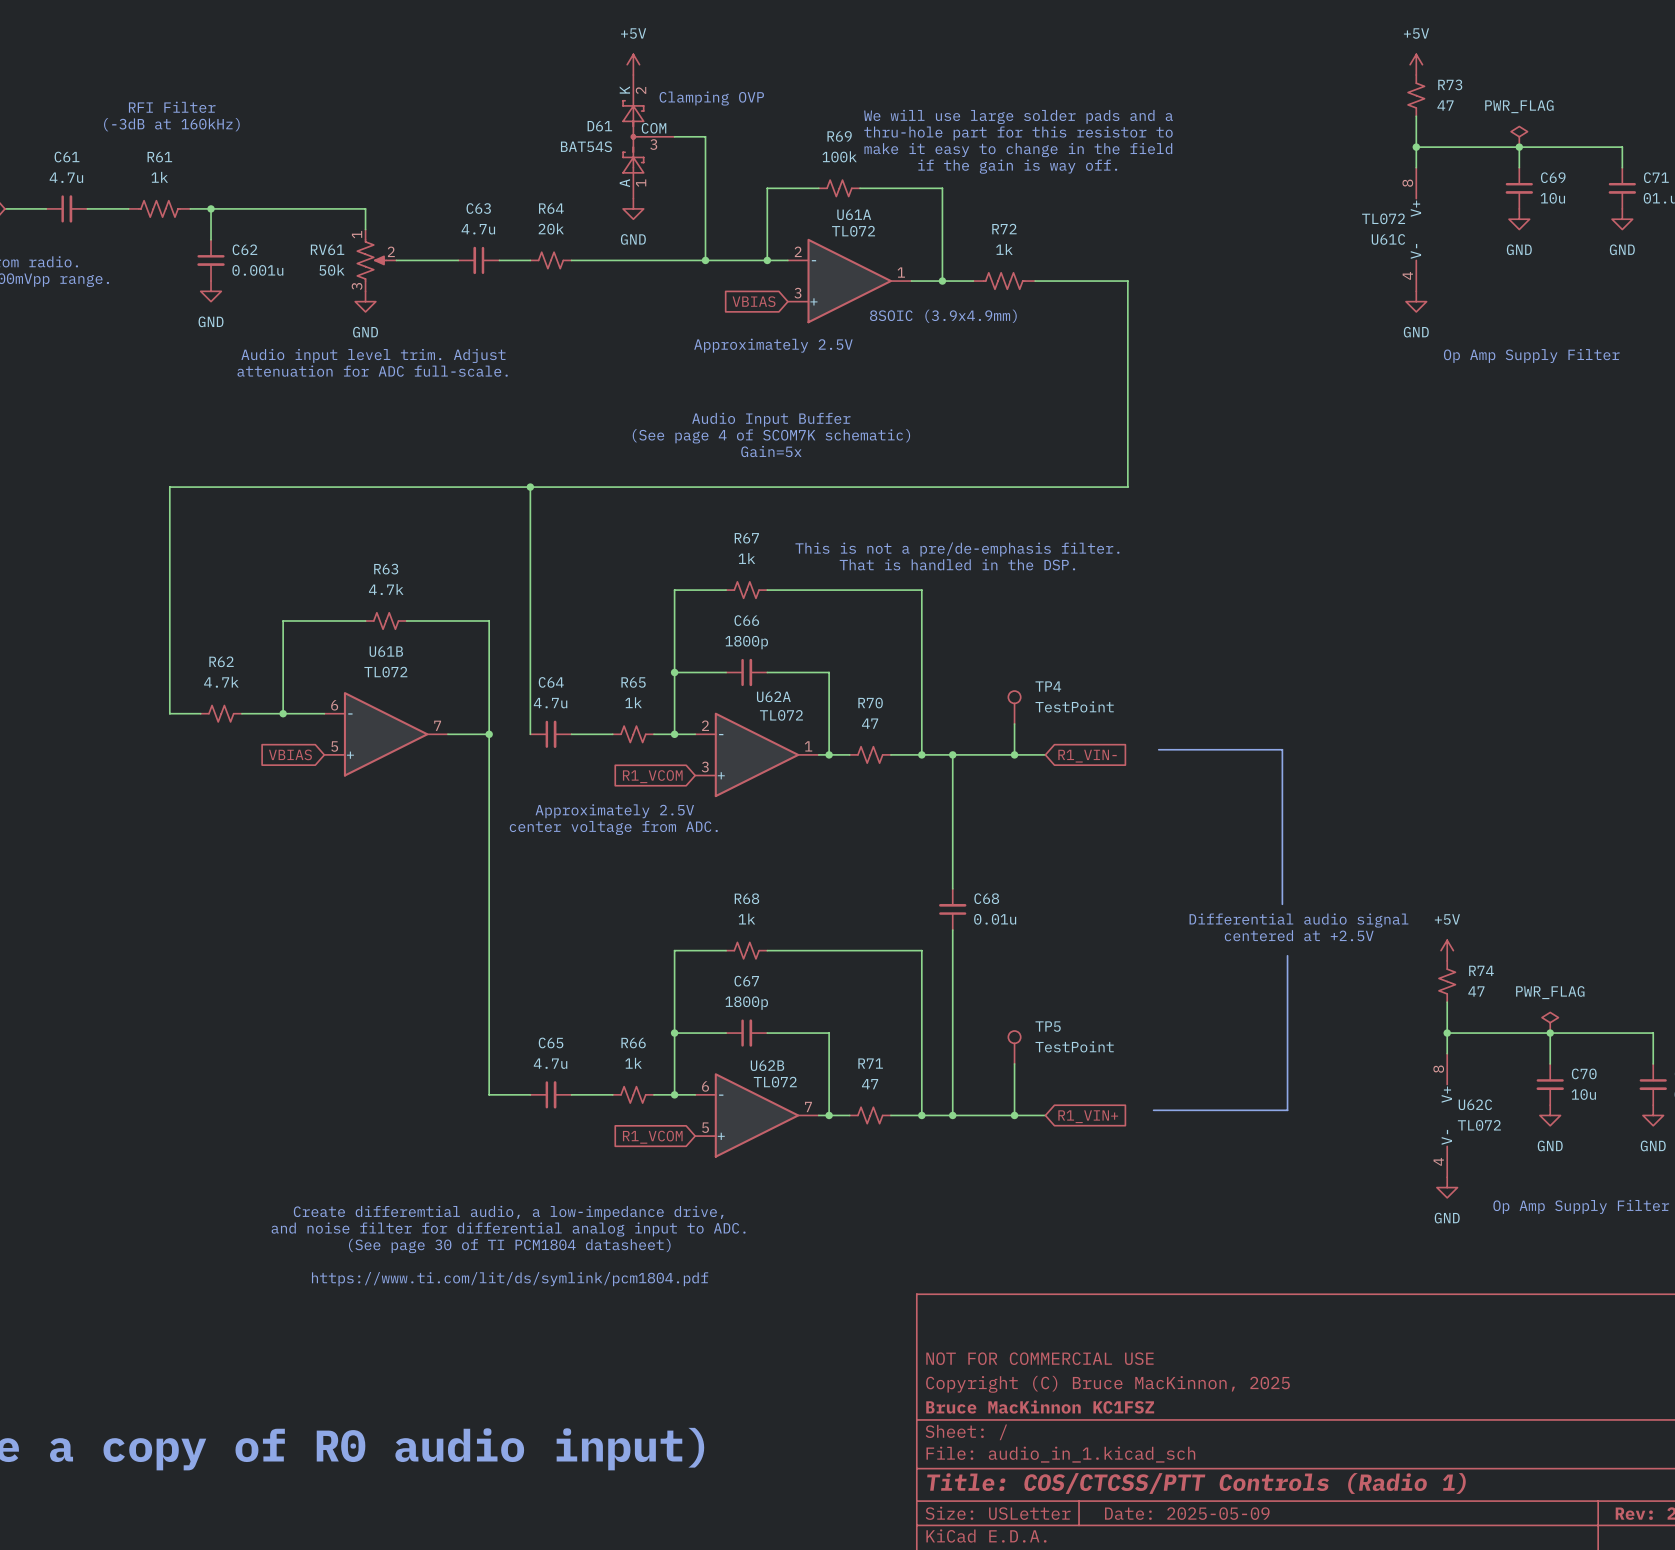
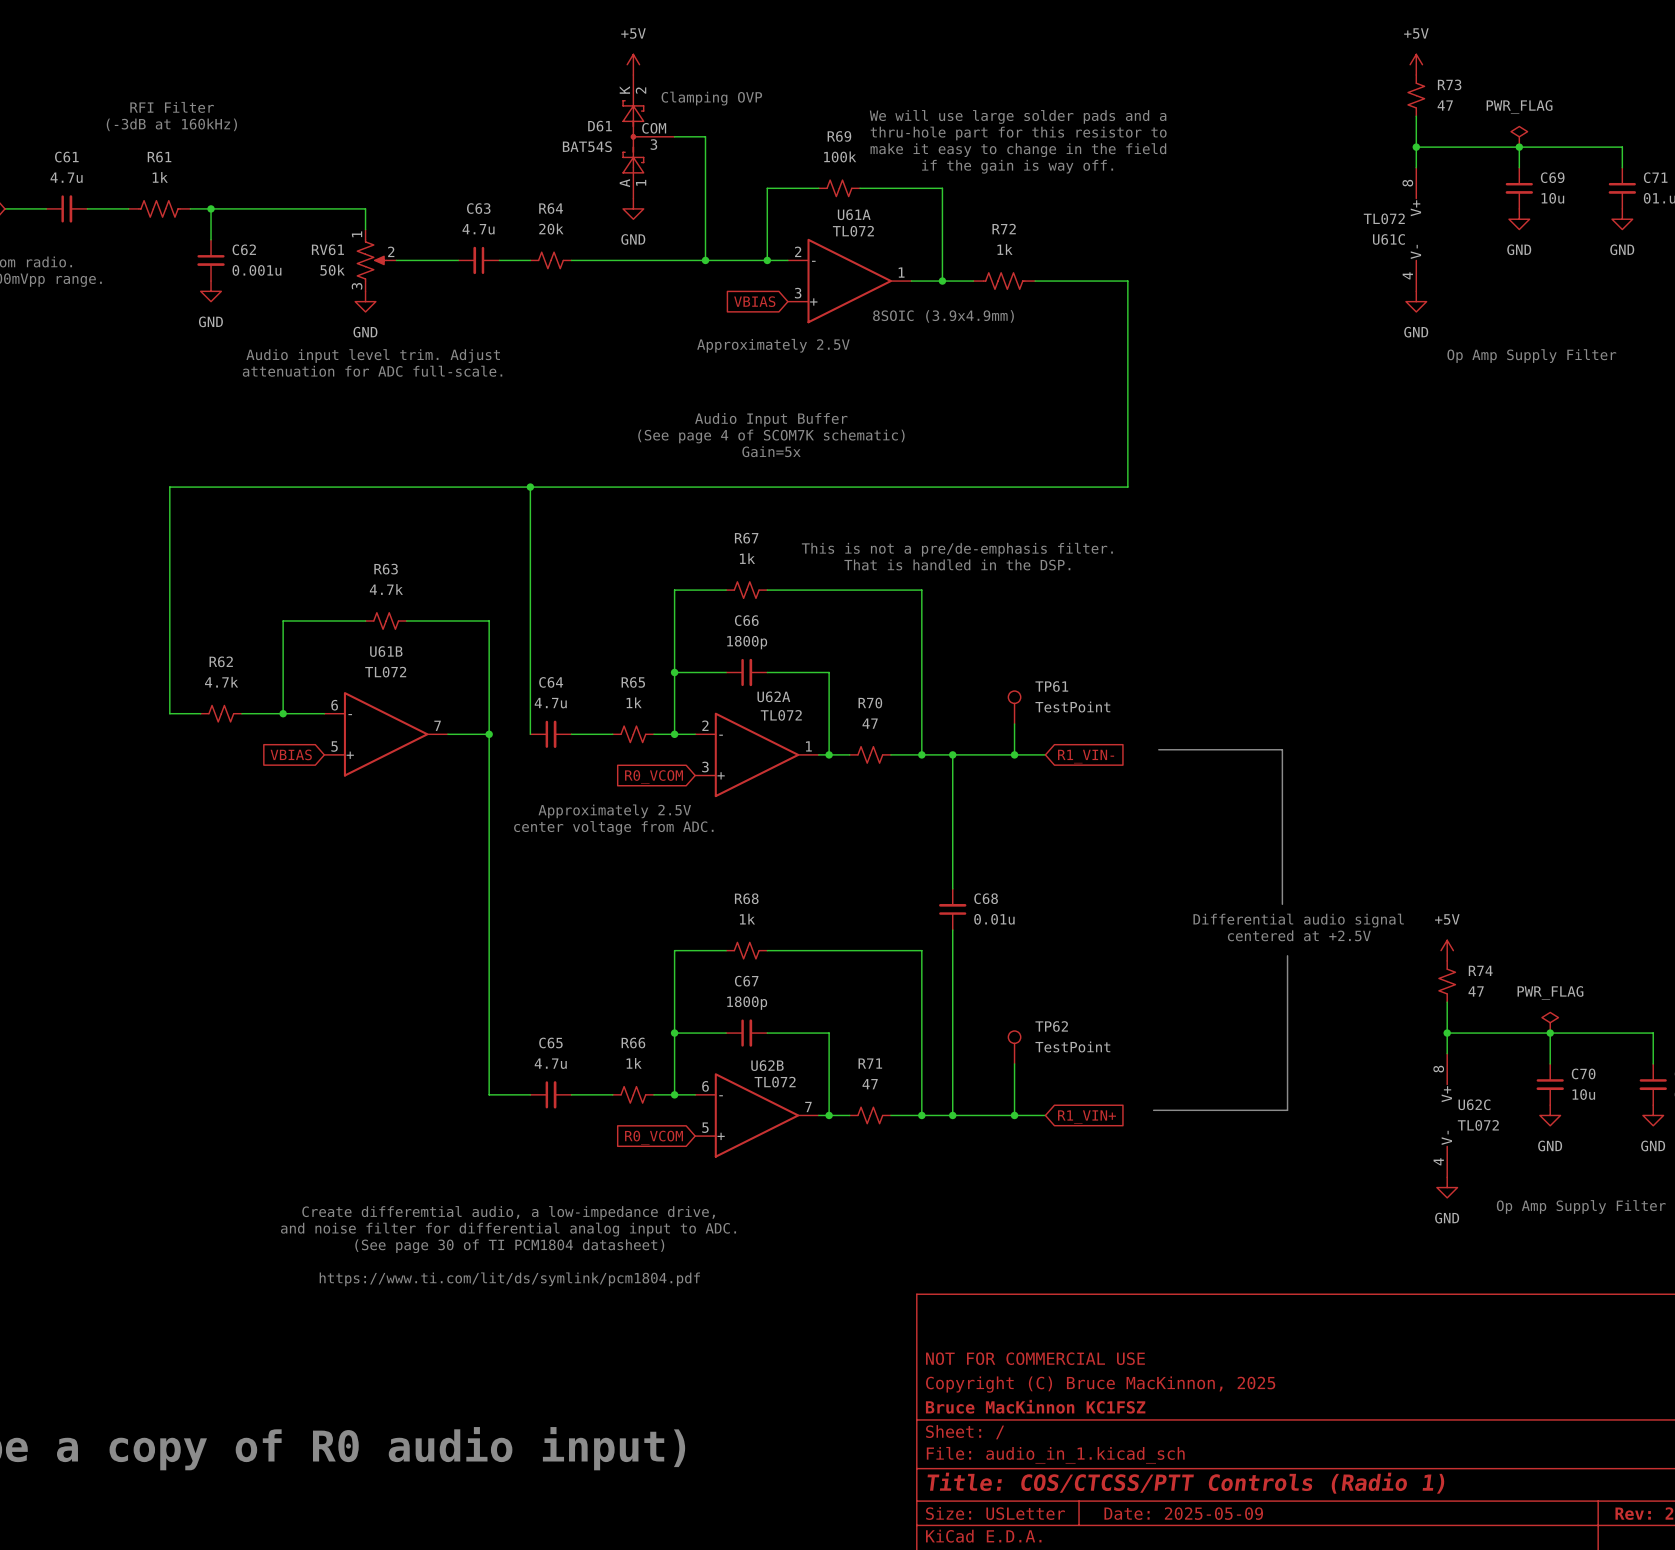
TP4 name: TP4 (1048, 686) -> TP61 (1051, 686)
global label: R1_VCOM (652, 776) -> R0_VCOM (654, 777)
TP5 name: TP5 (1048, 1026) -> TP62 (1051, 1026)
global label: R1_VCOM (652, 1137) -> R0_VCOM (654, 1137)

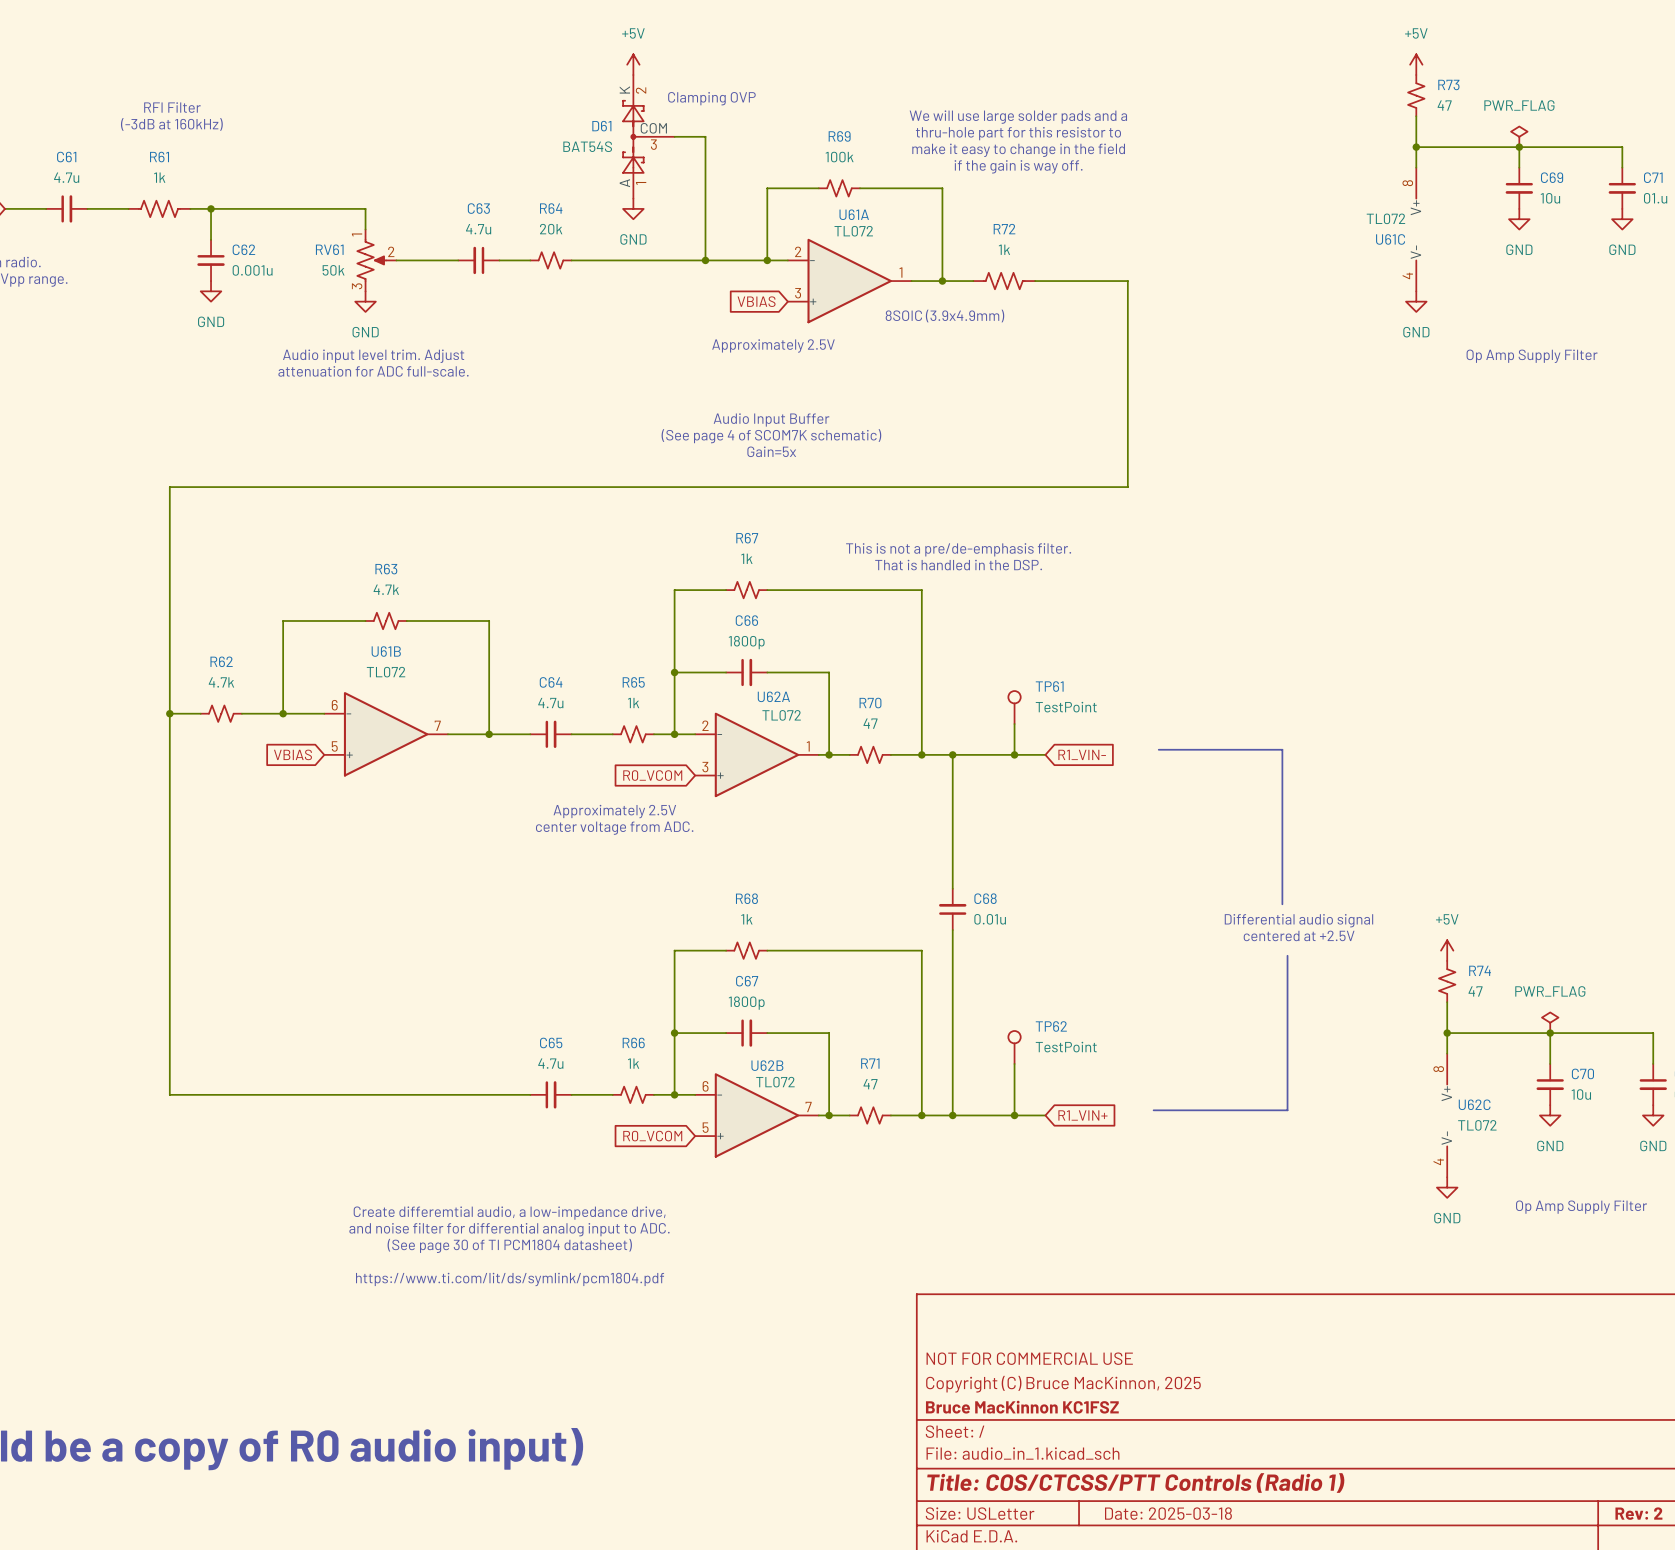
wire: (530, 487) (530, 734) -> (489, 734) (530, 734)
junction: (530, 487) -> none
junction: none -> (169, 713)
wire: (489, 734) (489, 1094) -> (169, 713) (169, 1094) (489, 1094)
title block: Date: 2025-05-09 (1183, 1513) -> Date: 2025-03-18 (1168, 1513)

